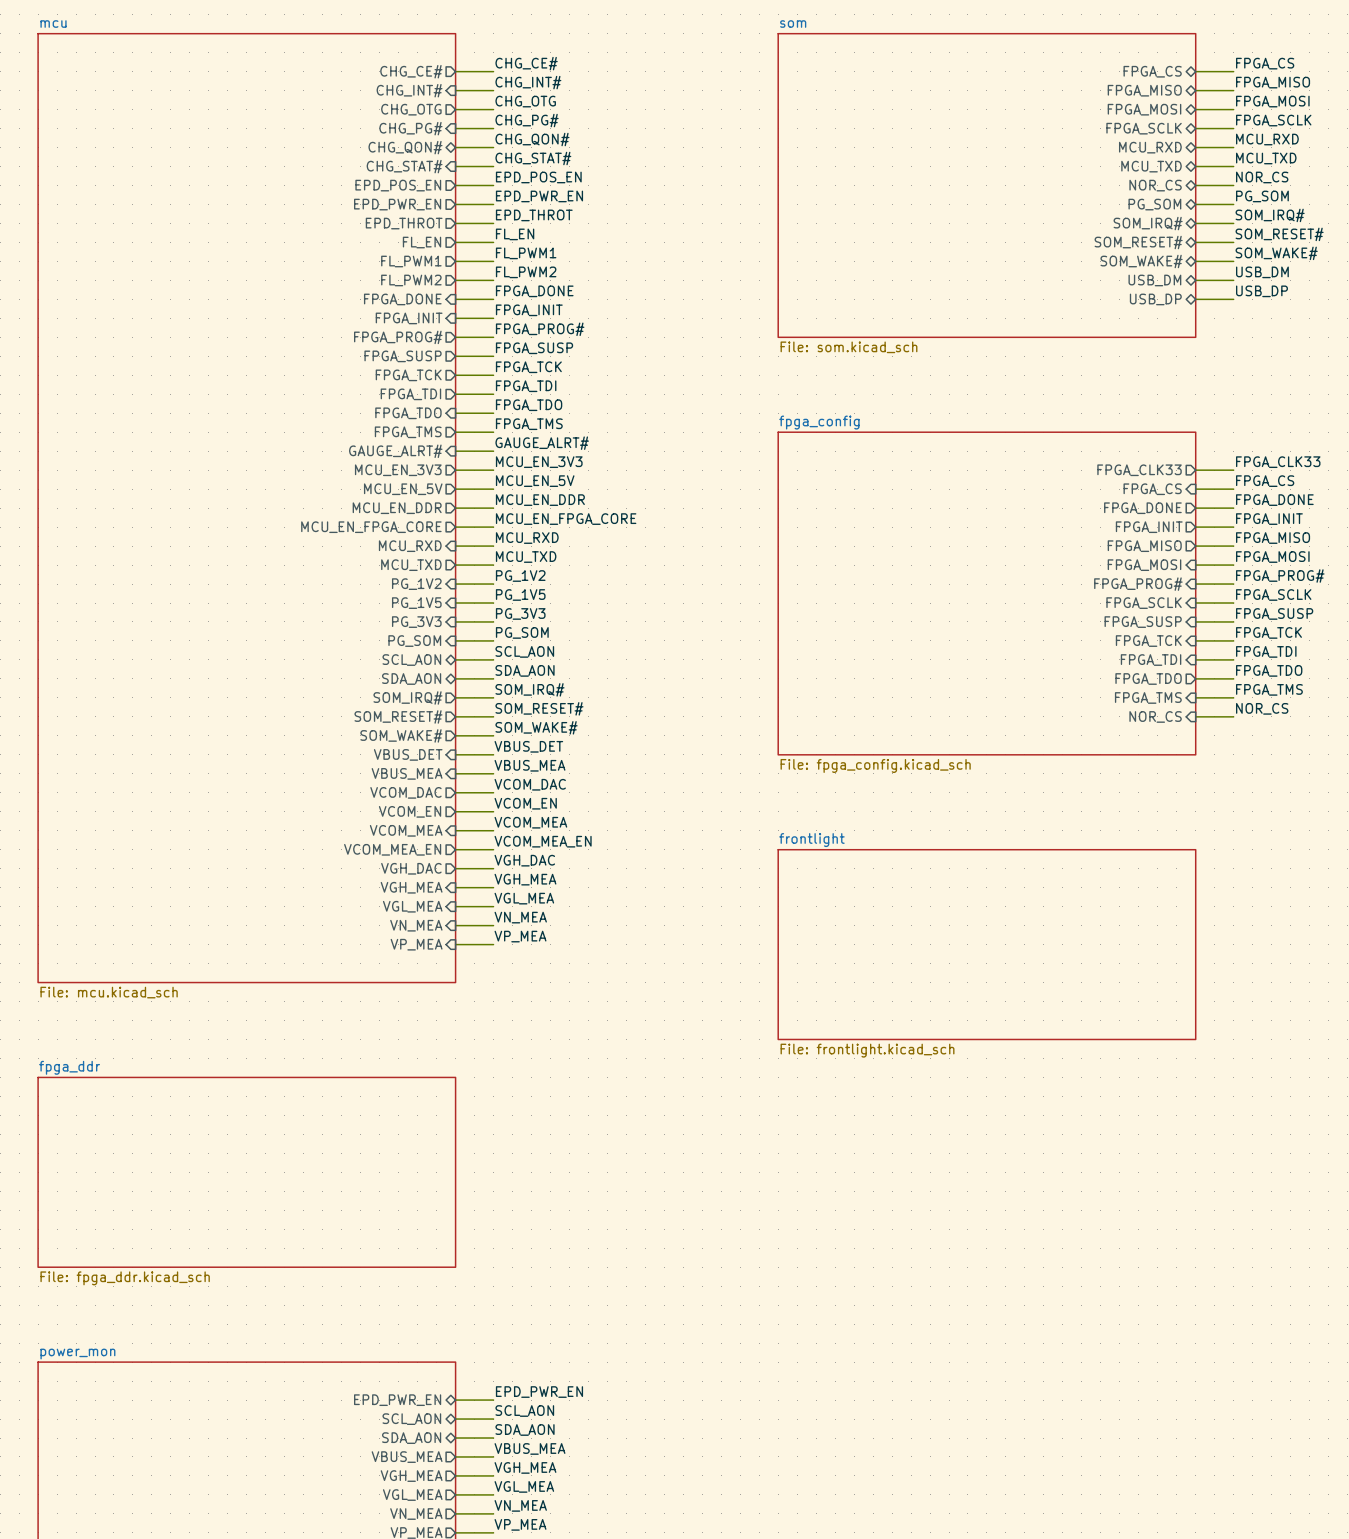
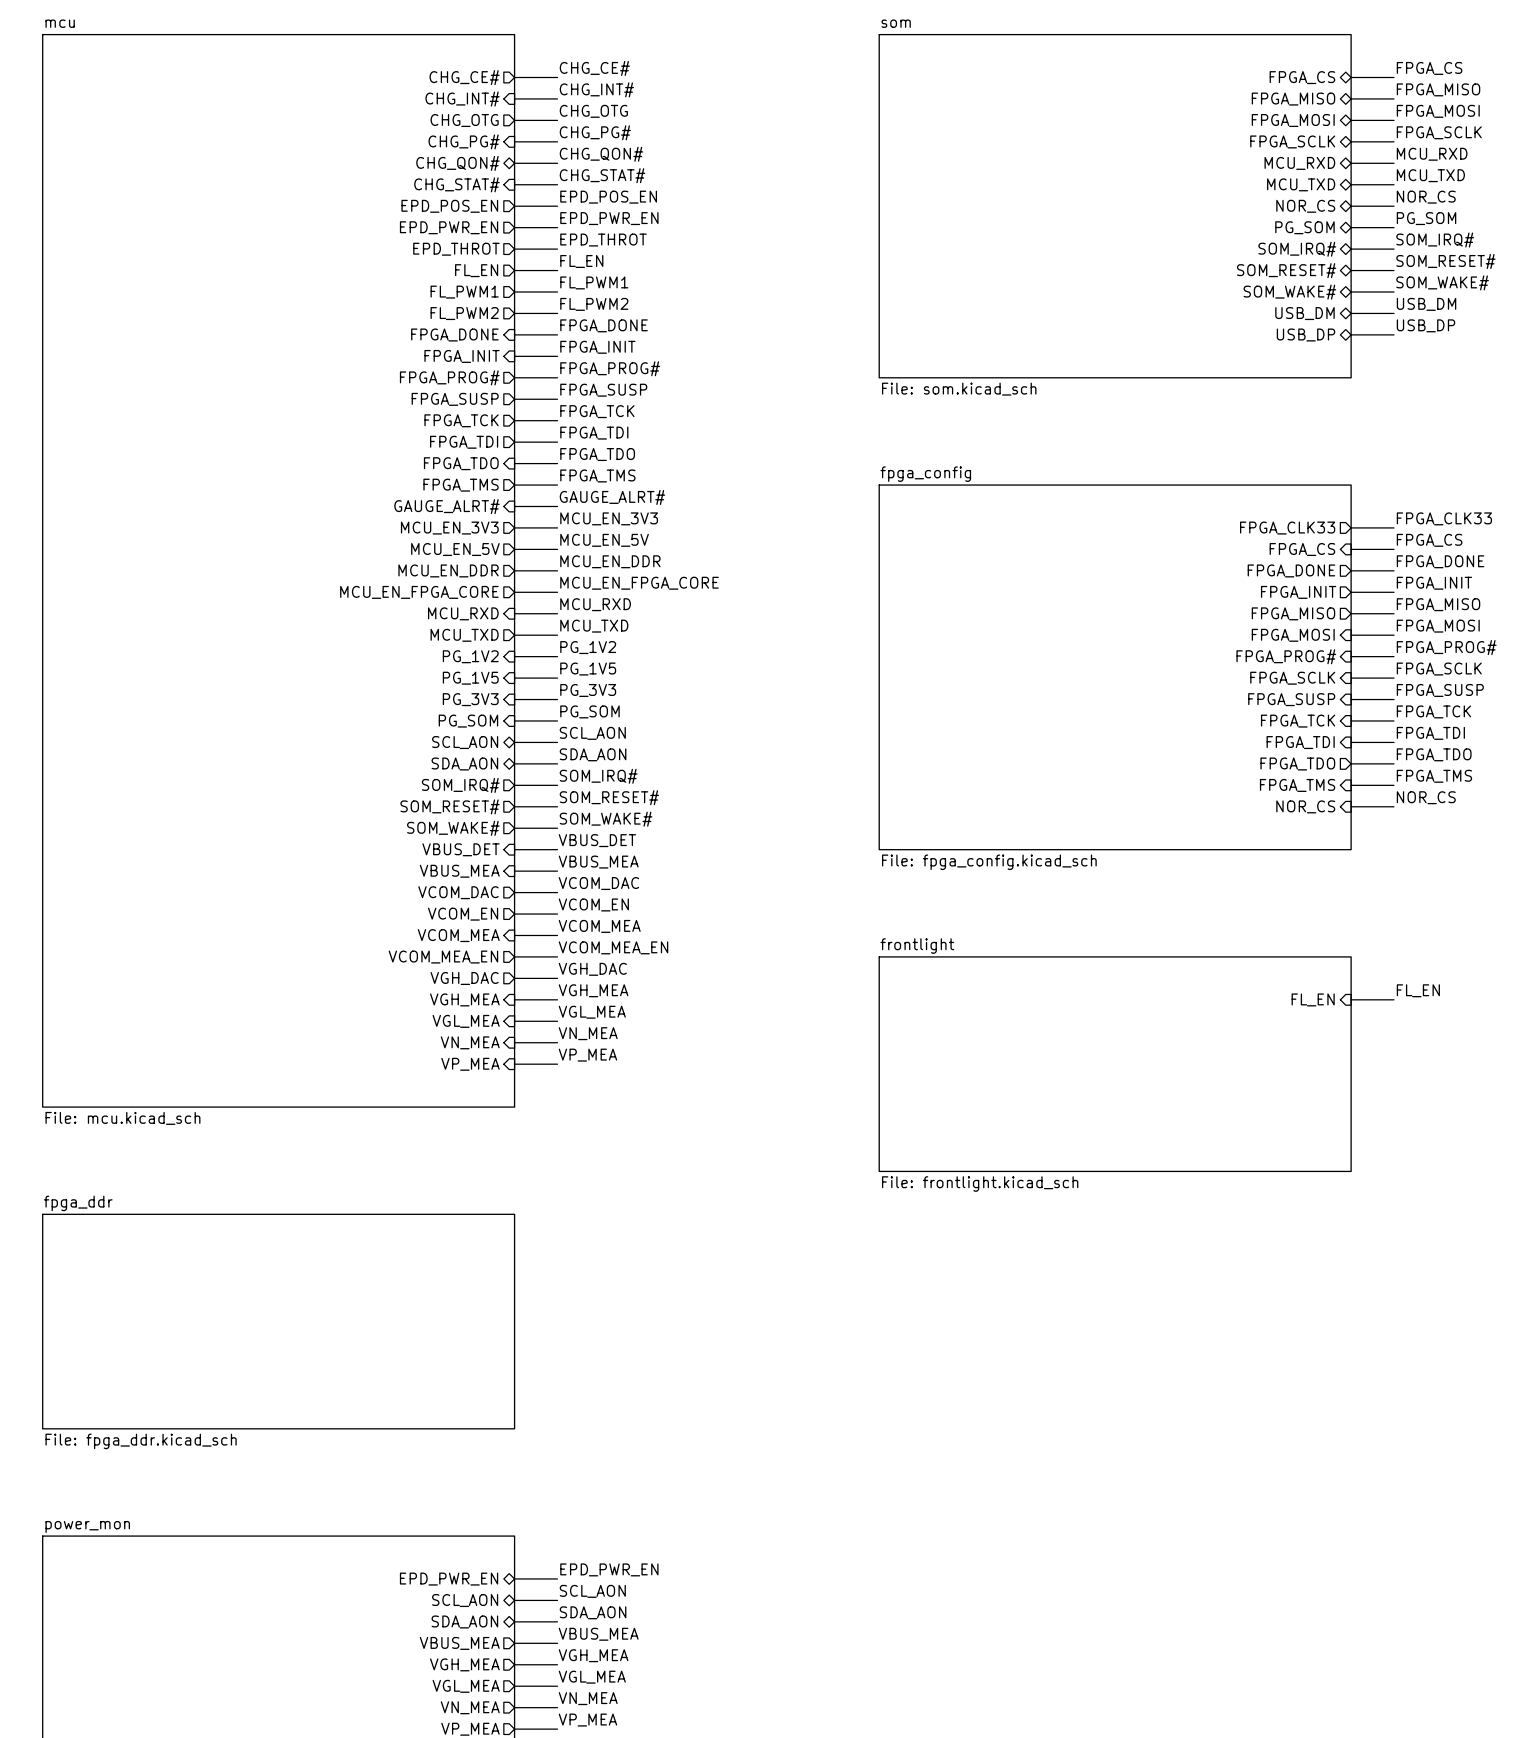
label: none -> FL_EN (1418, 990)
sheet pin: none -> FL_EN (1313, 999)
wire: none -> (1351, 999) (1394, 999)

